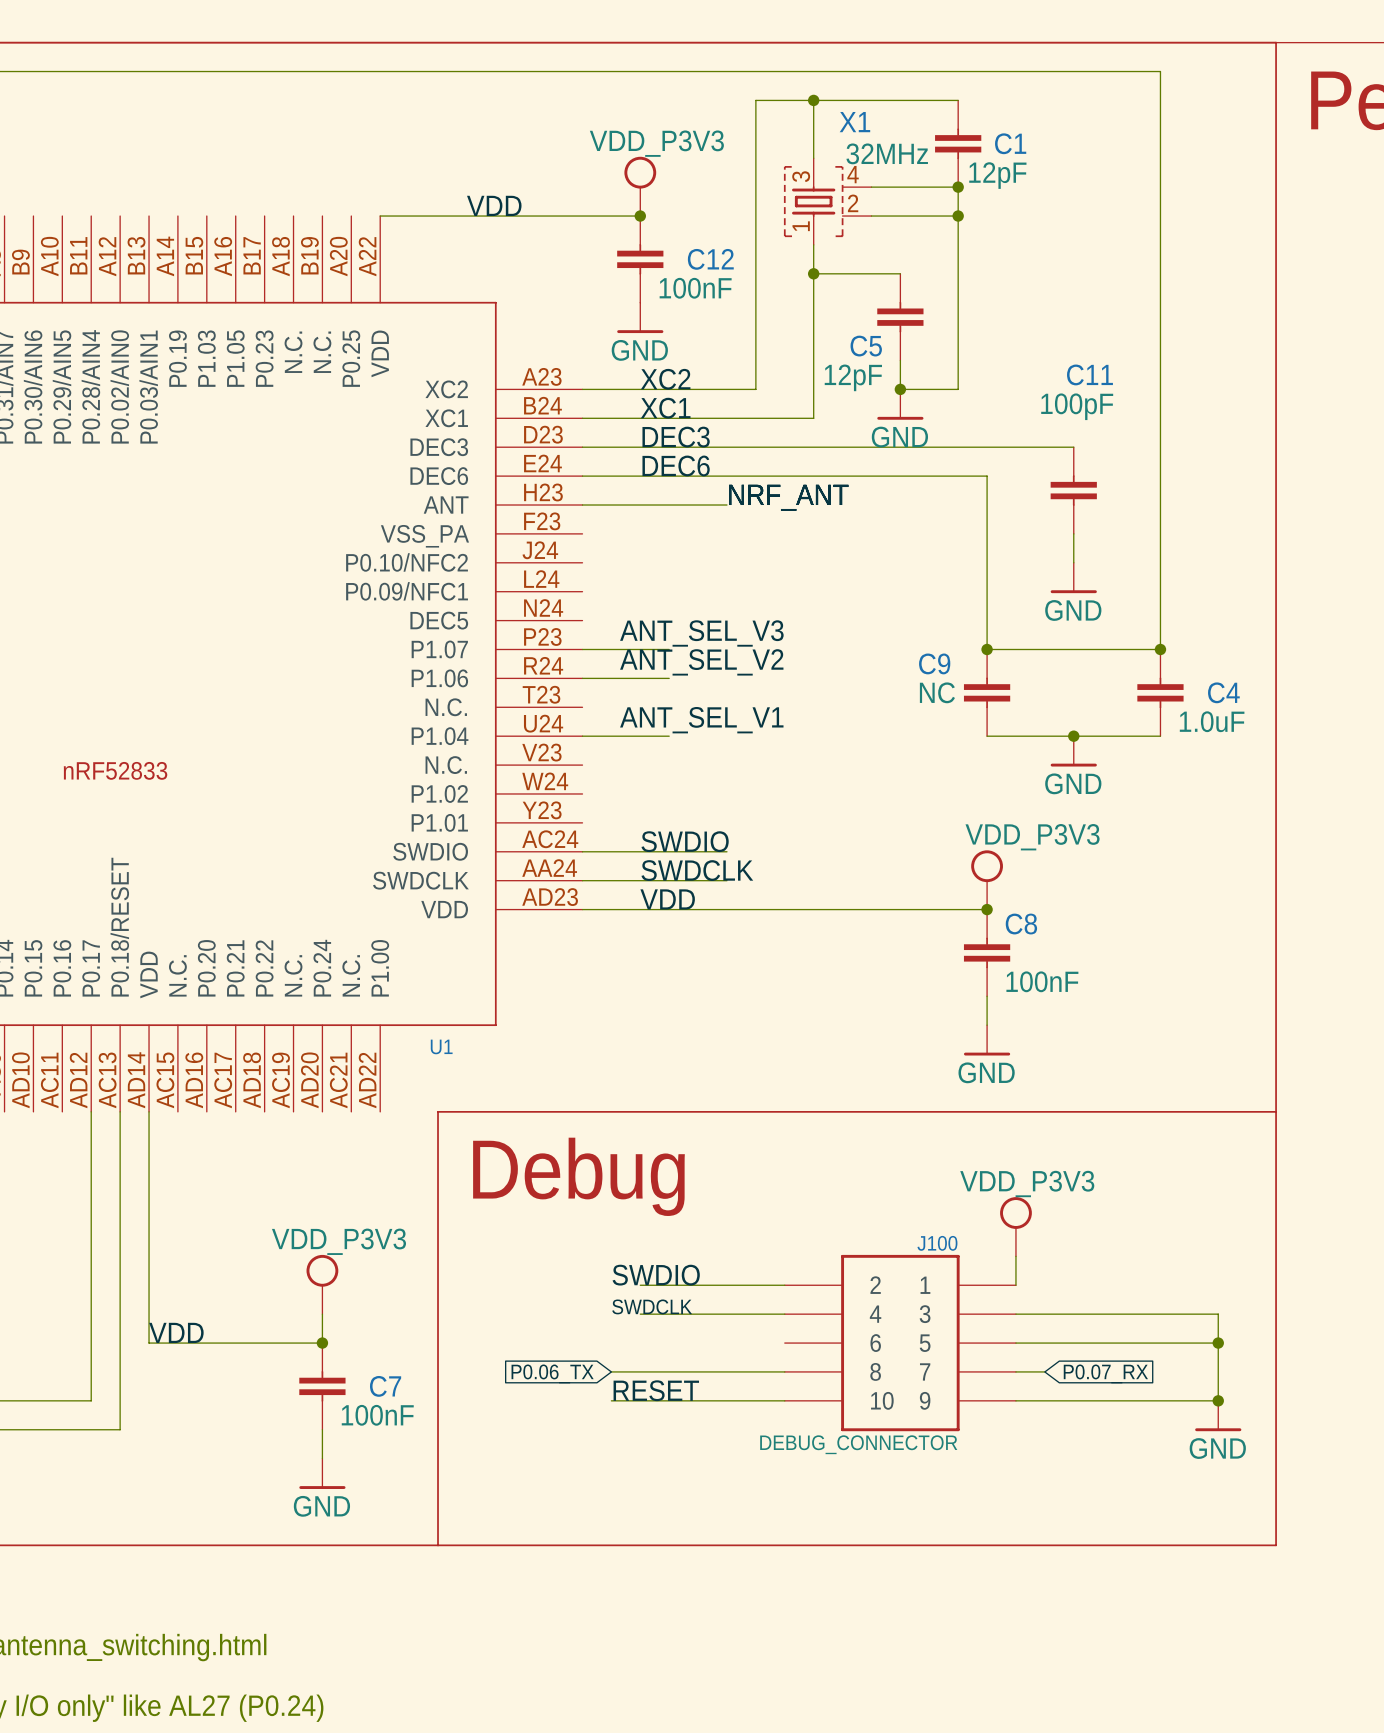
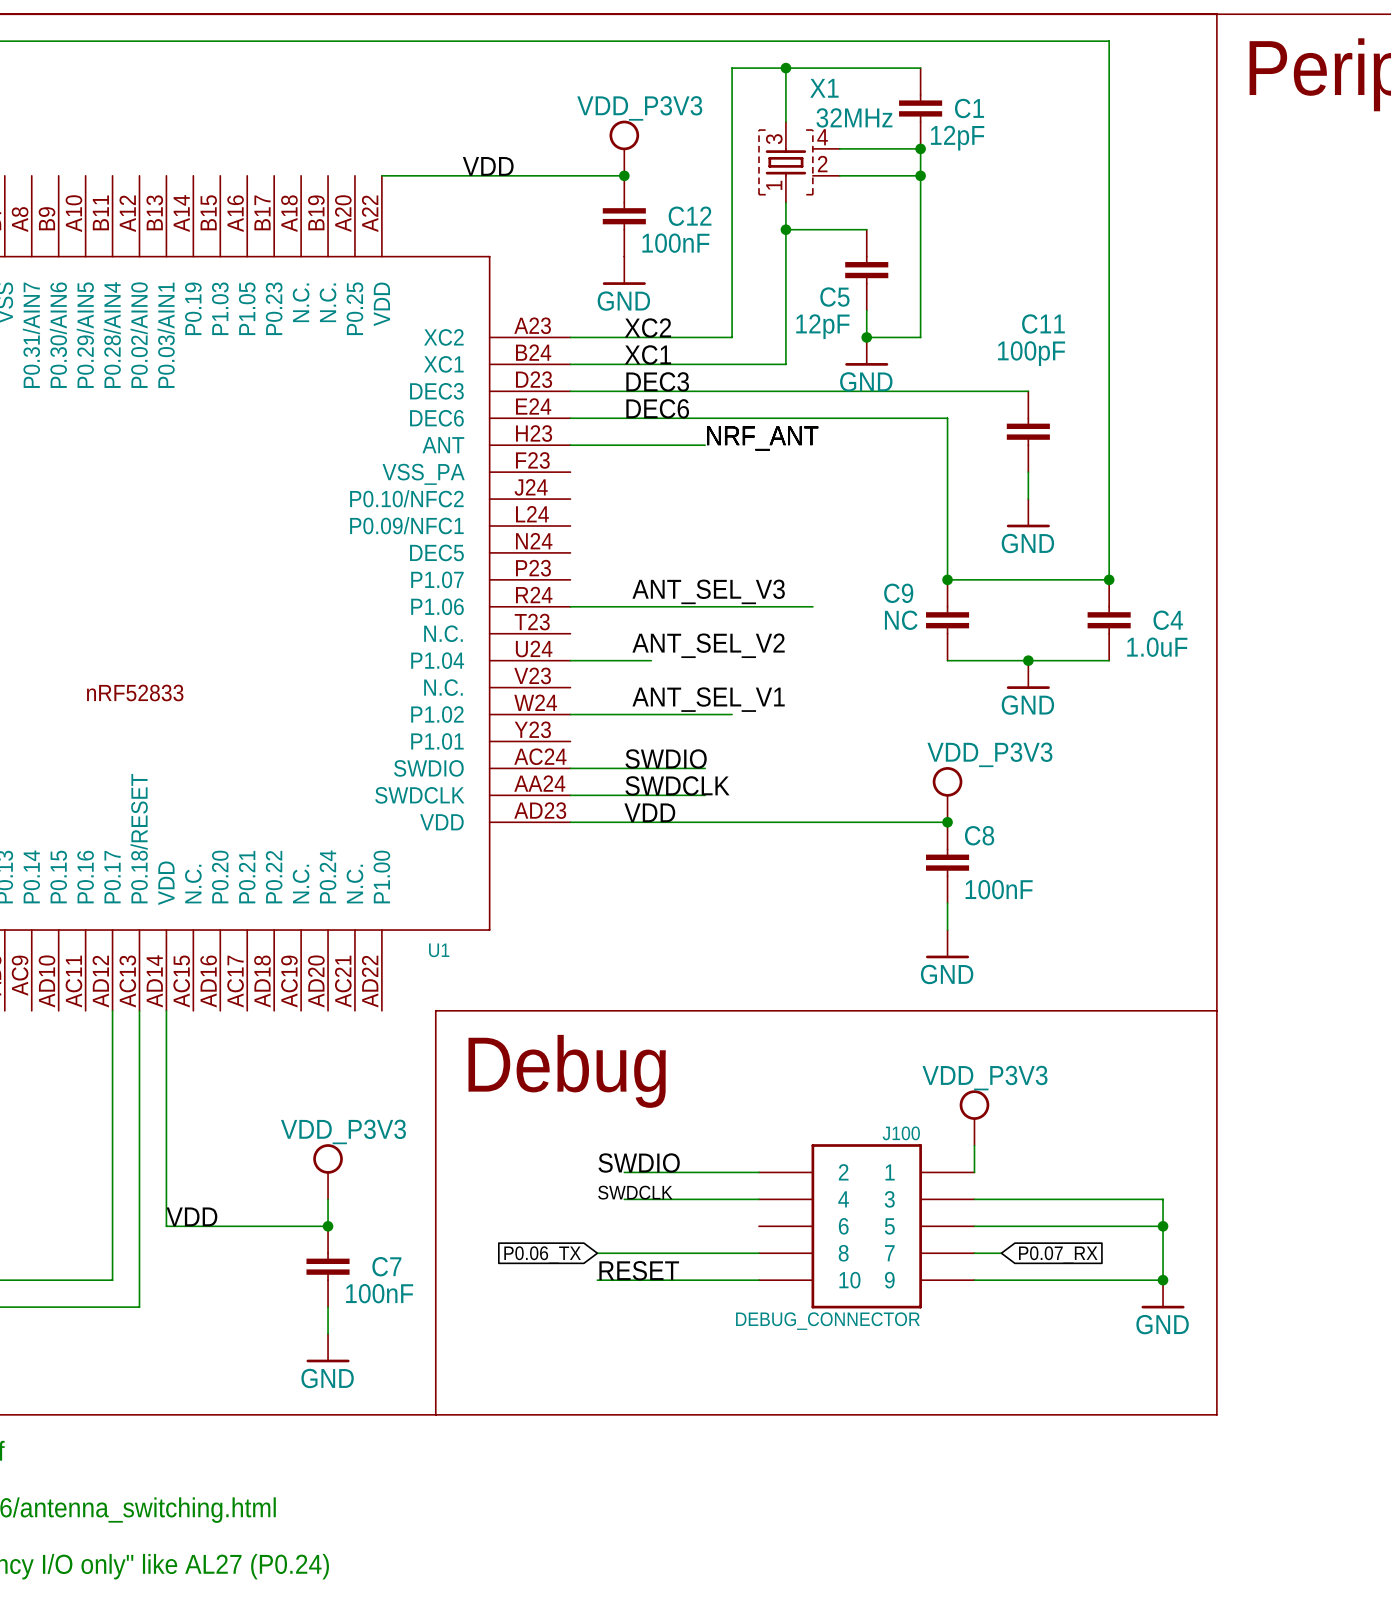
label position: ANT_SEL_V3 (701, 633) -> ANT_SEL_V3 (708, 591)
wire: (582, 649) (669, 649) -> none
label position: ANT_SEL_V2 (701, 662) -> ANT_SEL_V2 (708, 645)
wire: none -> (651, 606) (812, 606)
label position: ANT_SEL_V1 (701, 720) -> ANT_SEL_V1 (708, 699)
wire: none -> (570, 714) (732, 714)

